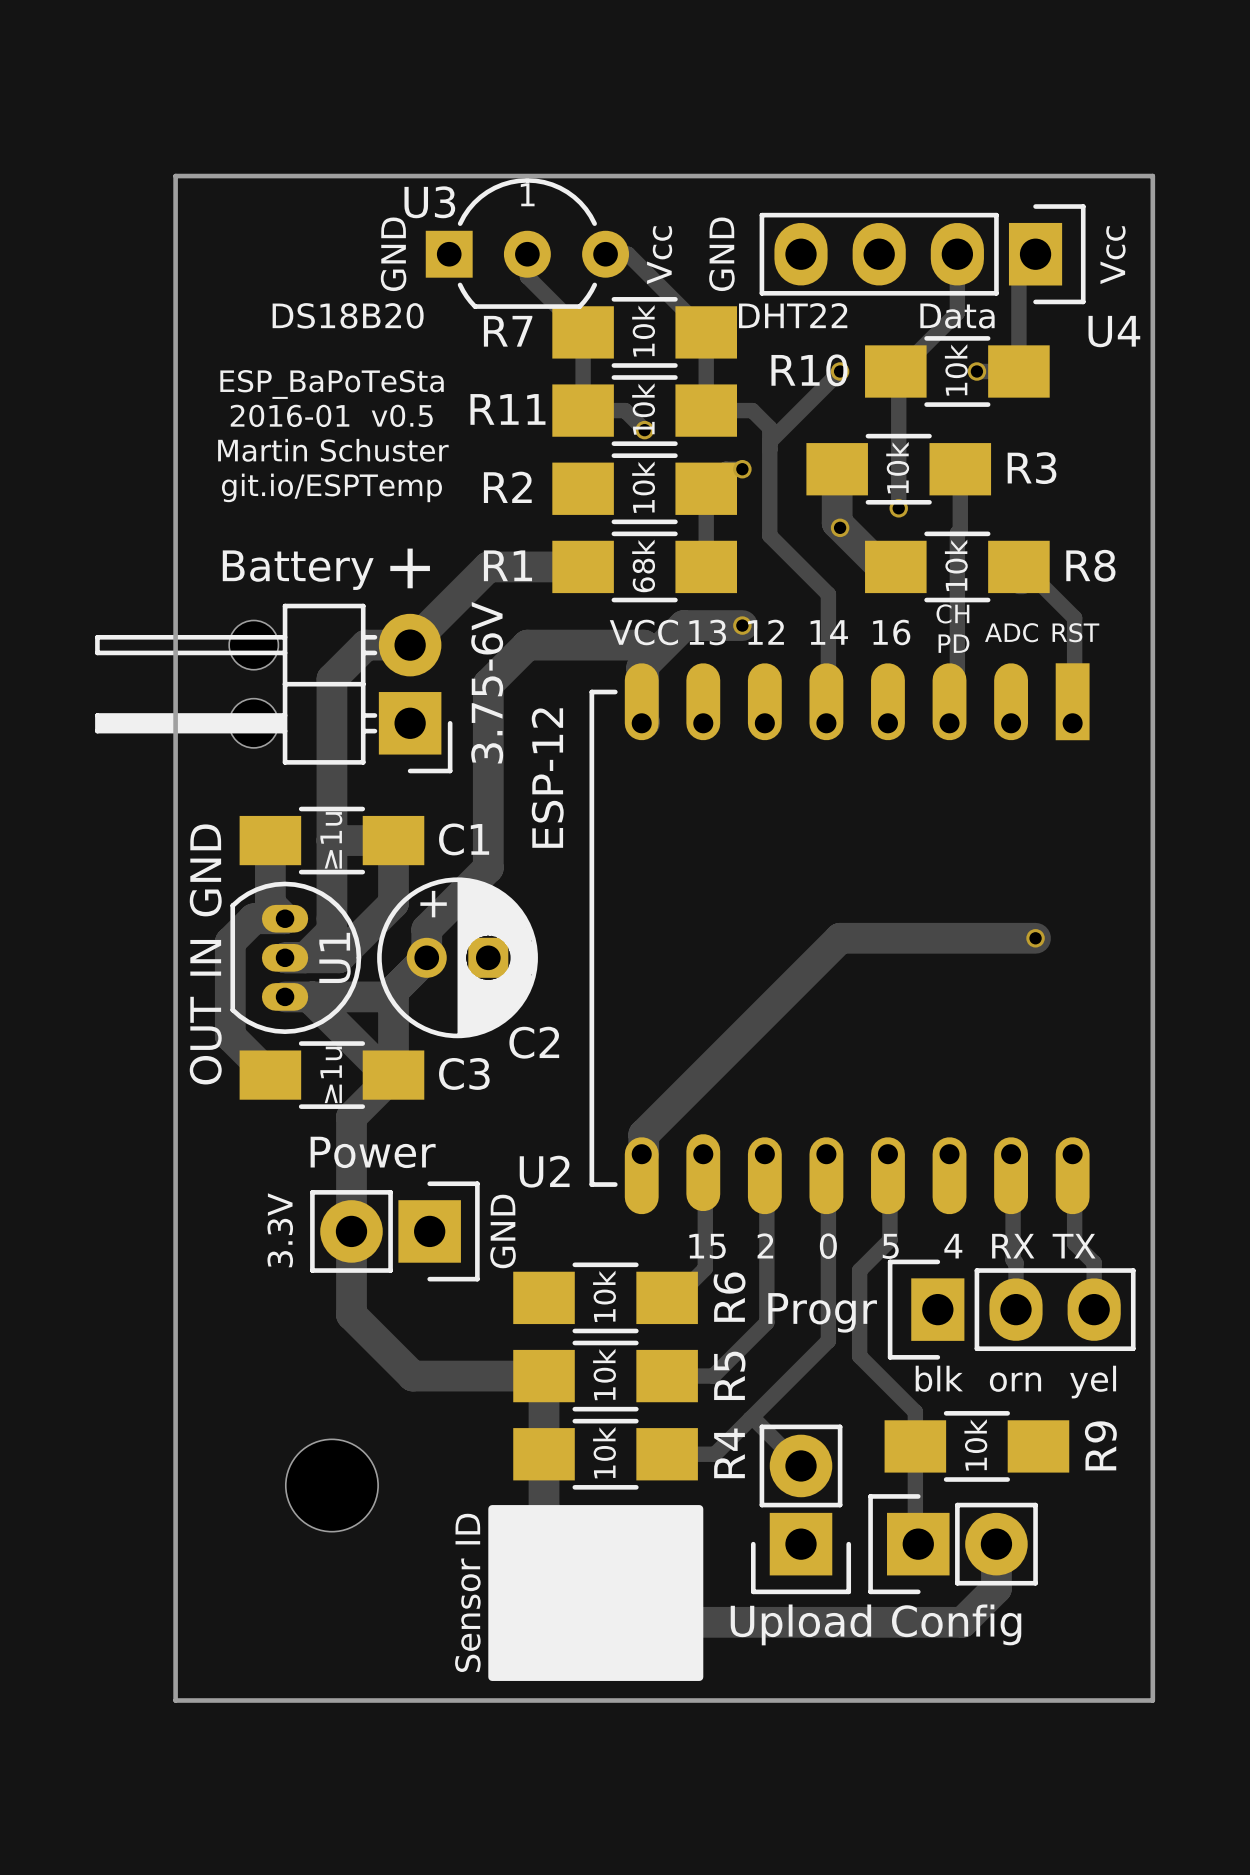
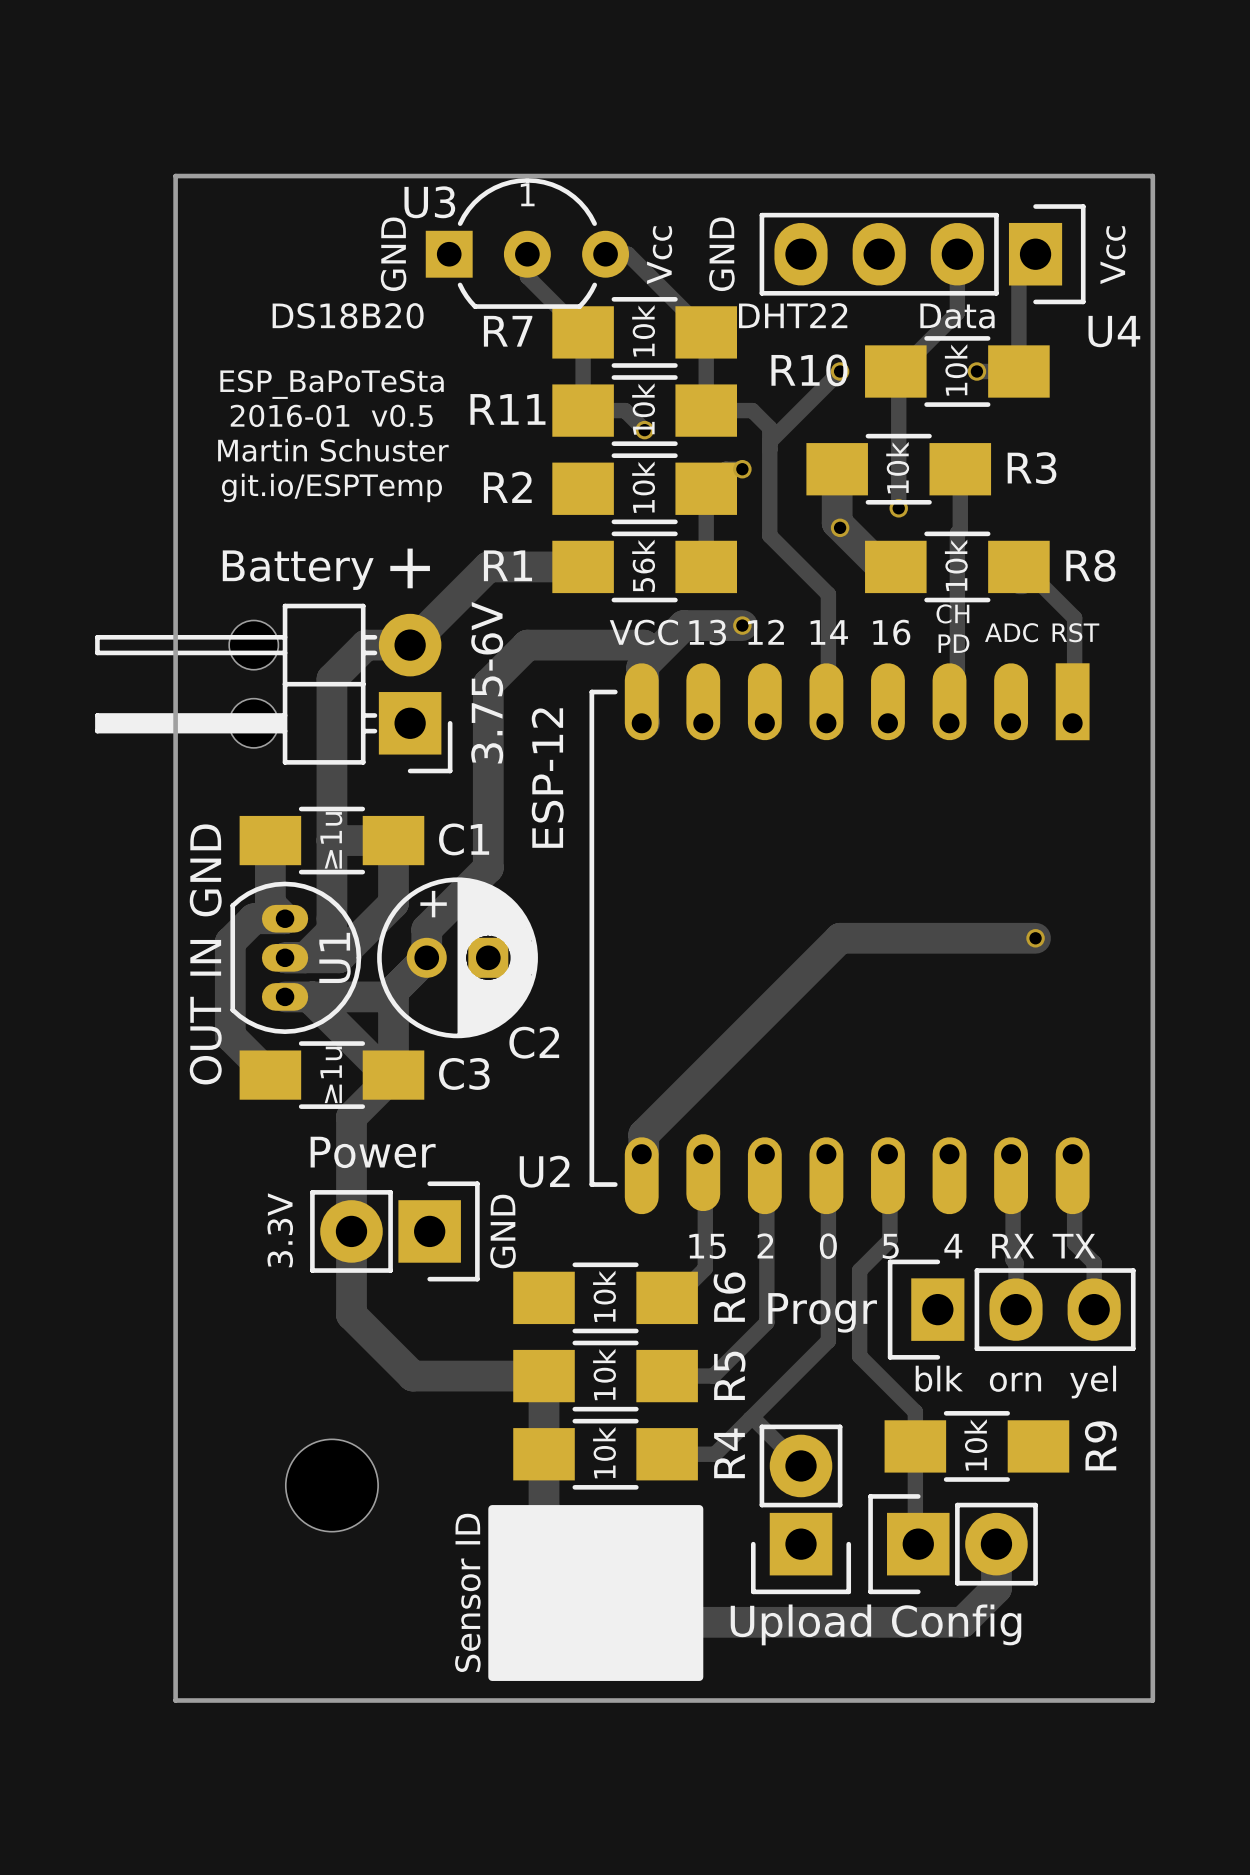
R1 value: 68k (643, 565) -> 56k (643, 565)

